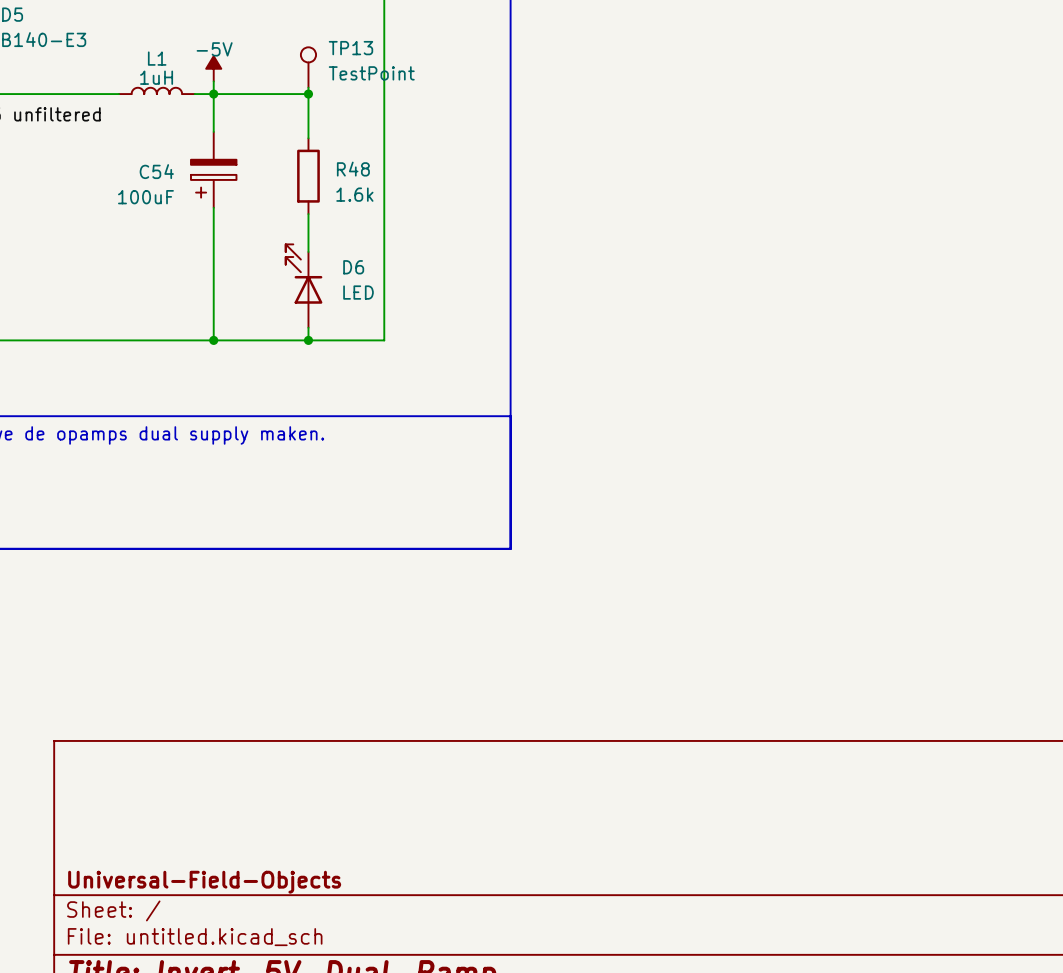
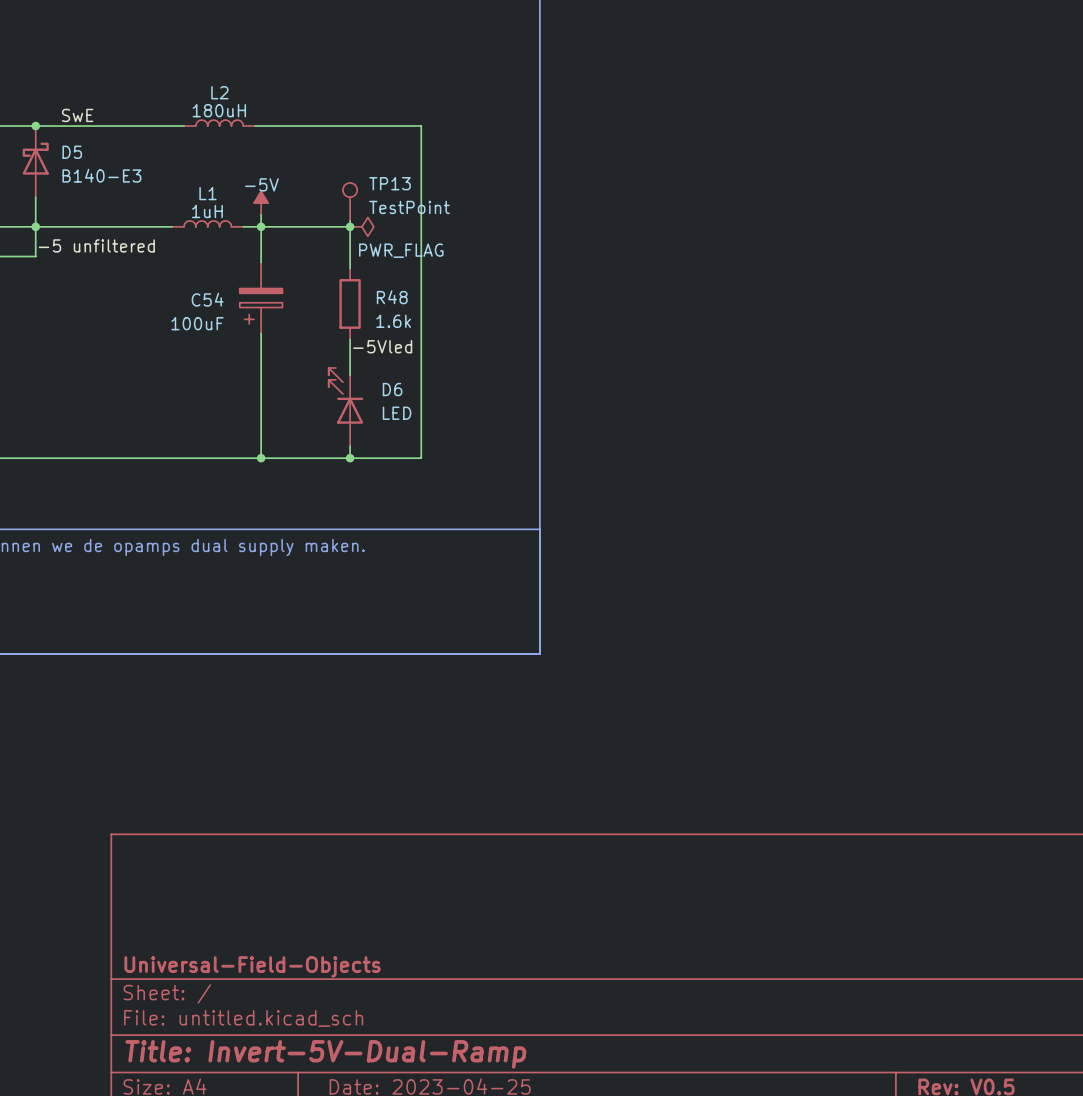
power symbol: none -> PWR_FLAG (361, 226)
label: none -> -5Vled (382, 346)

